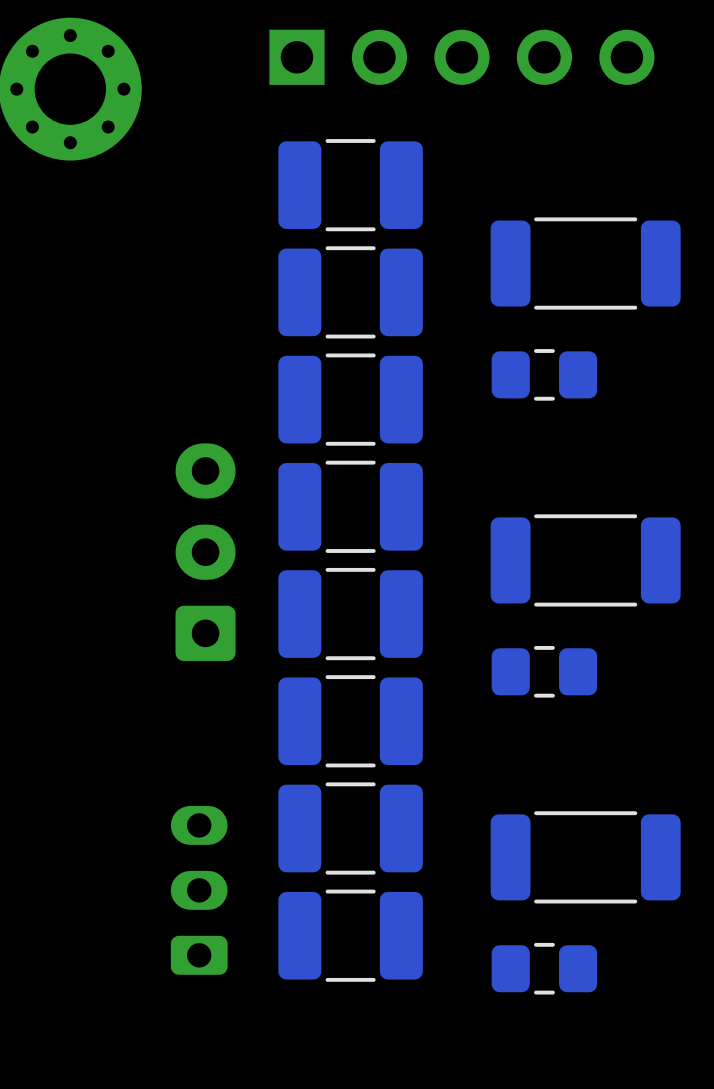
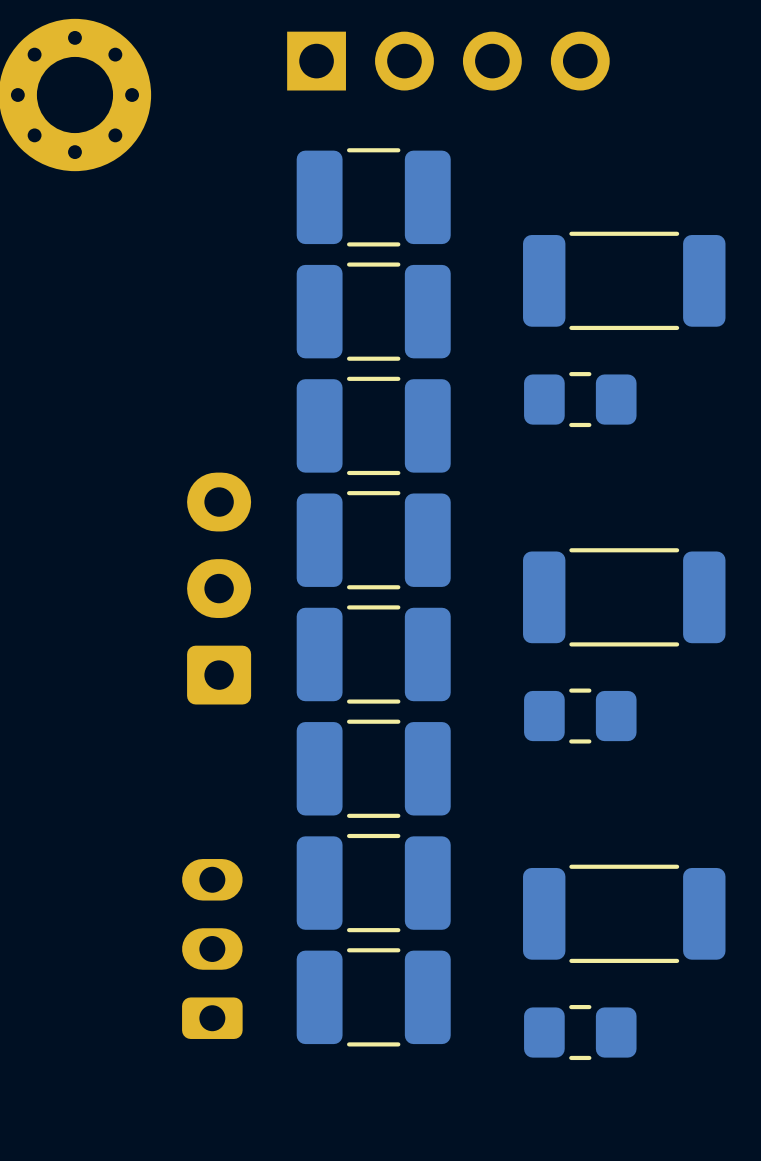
part: (461, 57) -> none

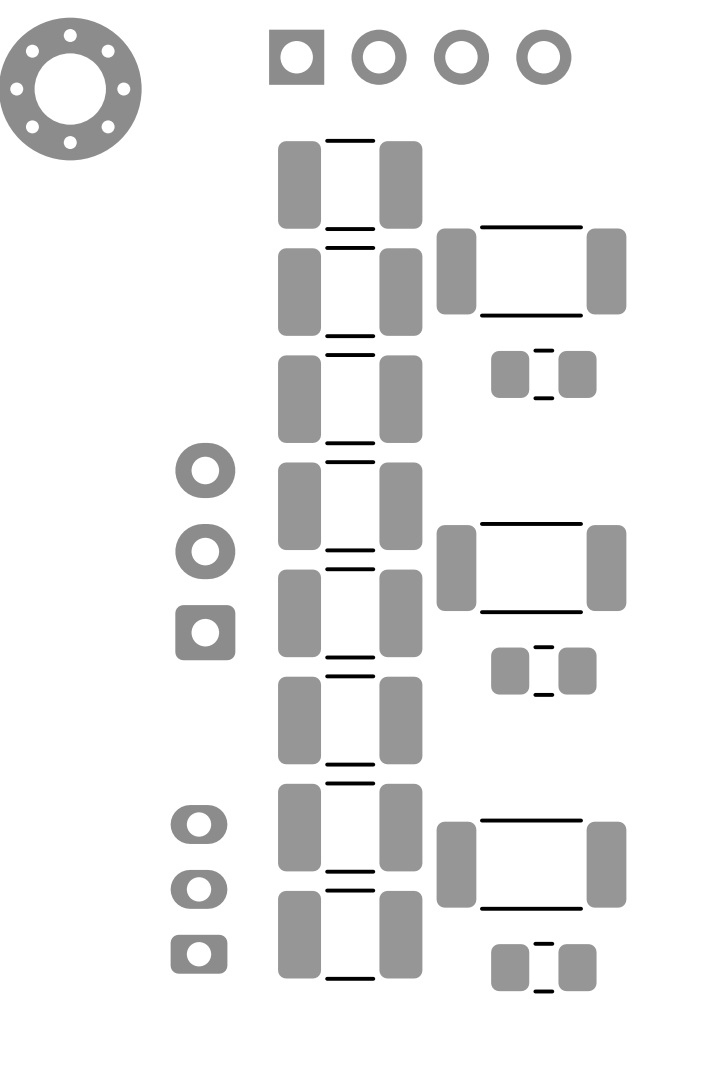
part position: (624, 280) -> (531, 271)
part position: (624, 597) -> (531, 568)
part position: (624, 913) -> (531, 864)

